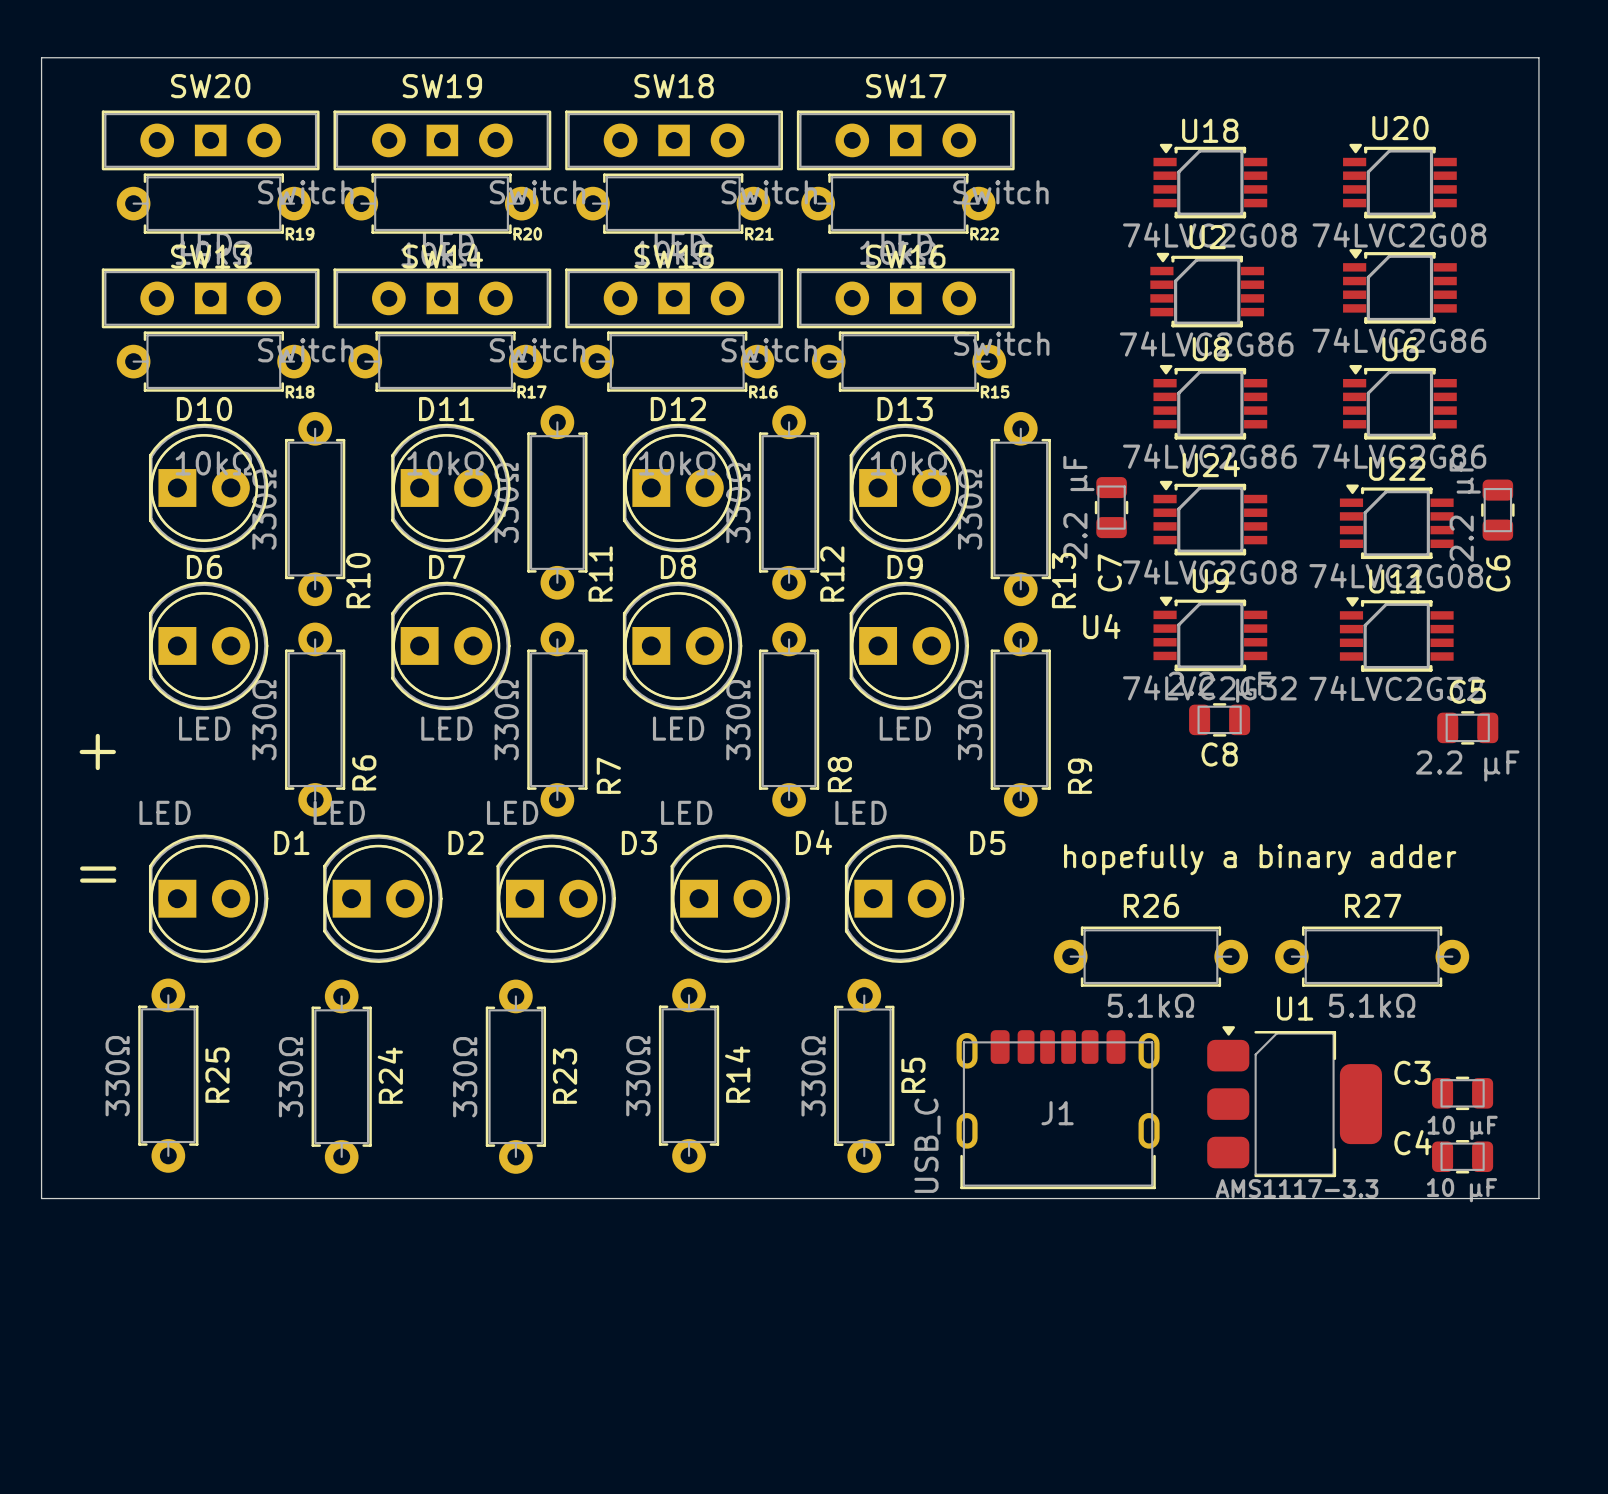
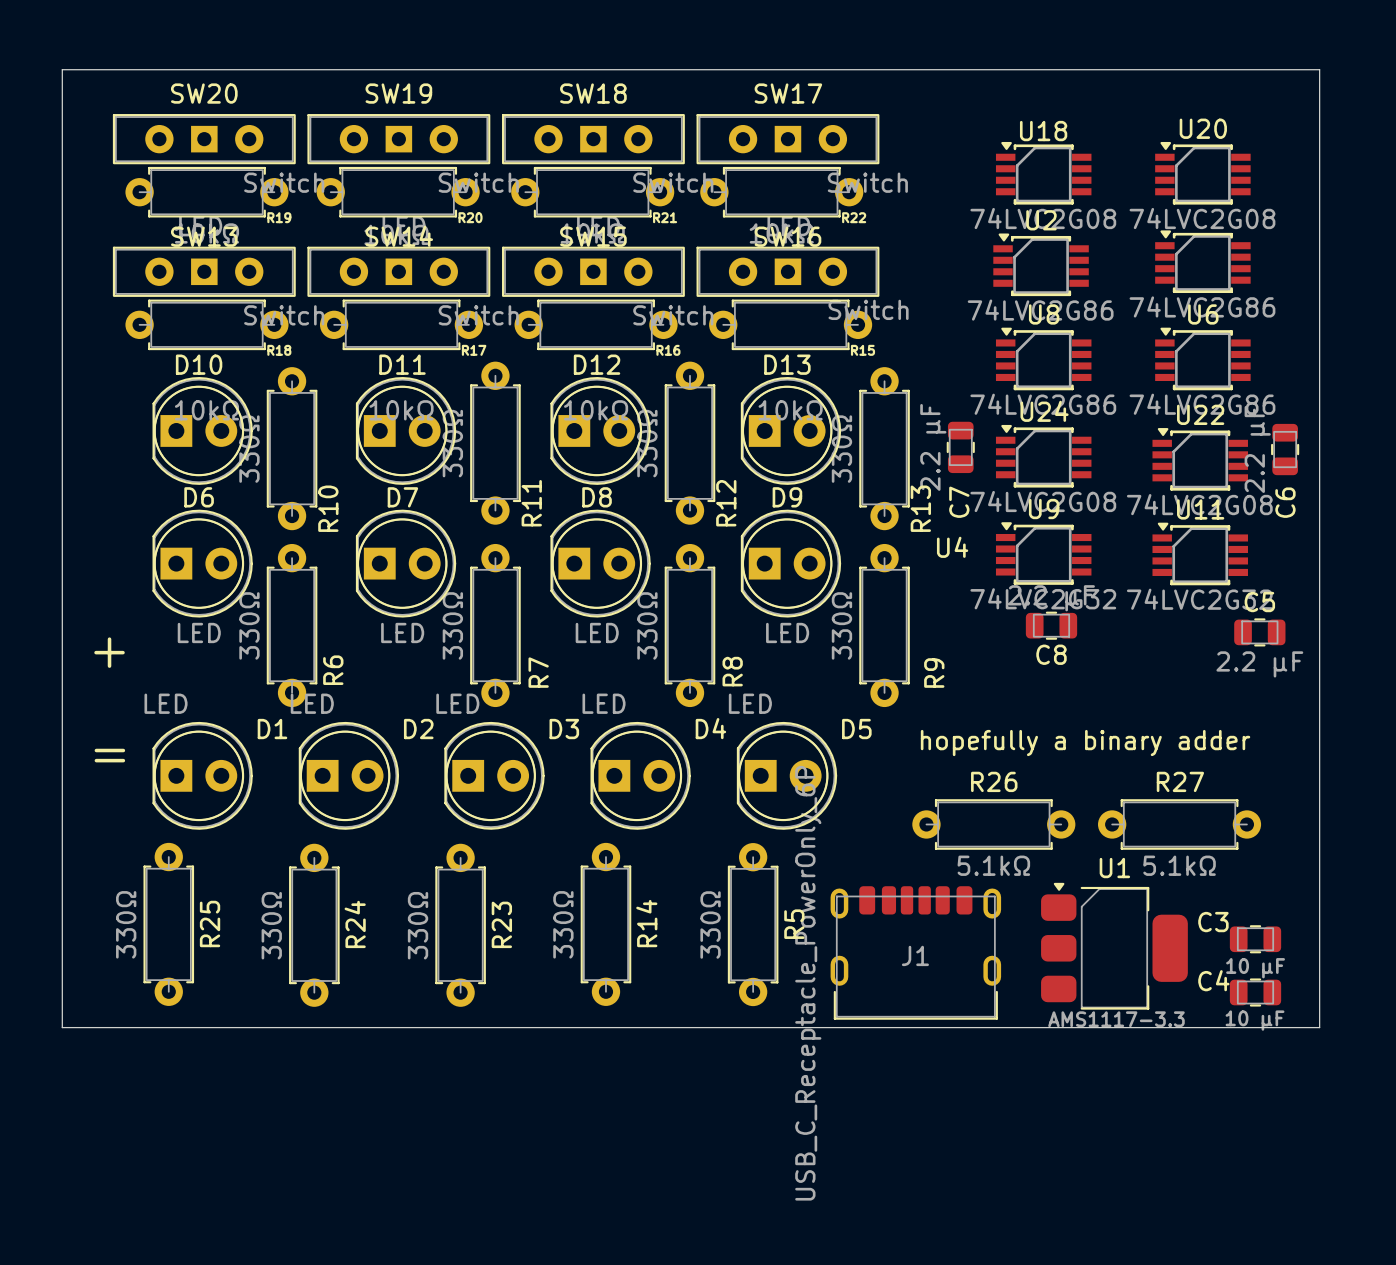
J1 value: USB_C (927, 1145) -> USB_C_Receptacle_PowerOnly_6P (808, 983)

